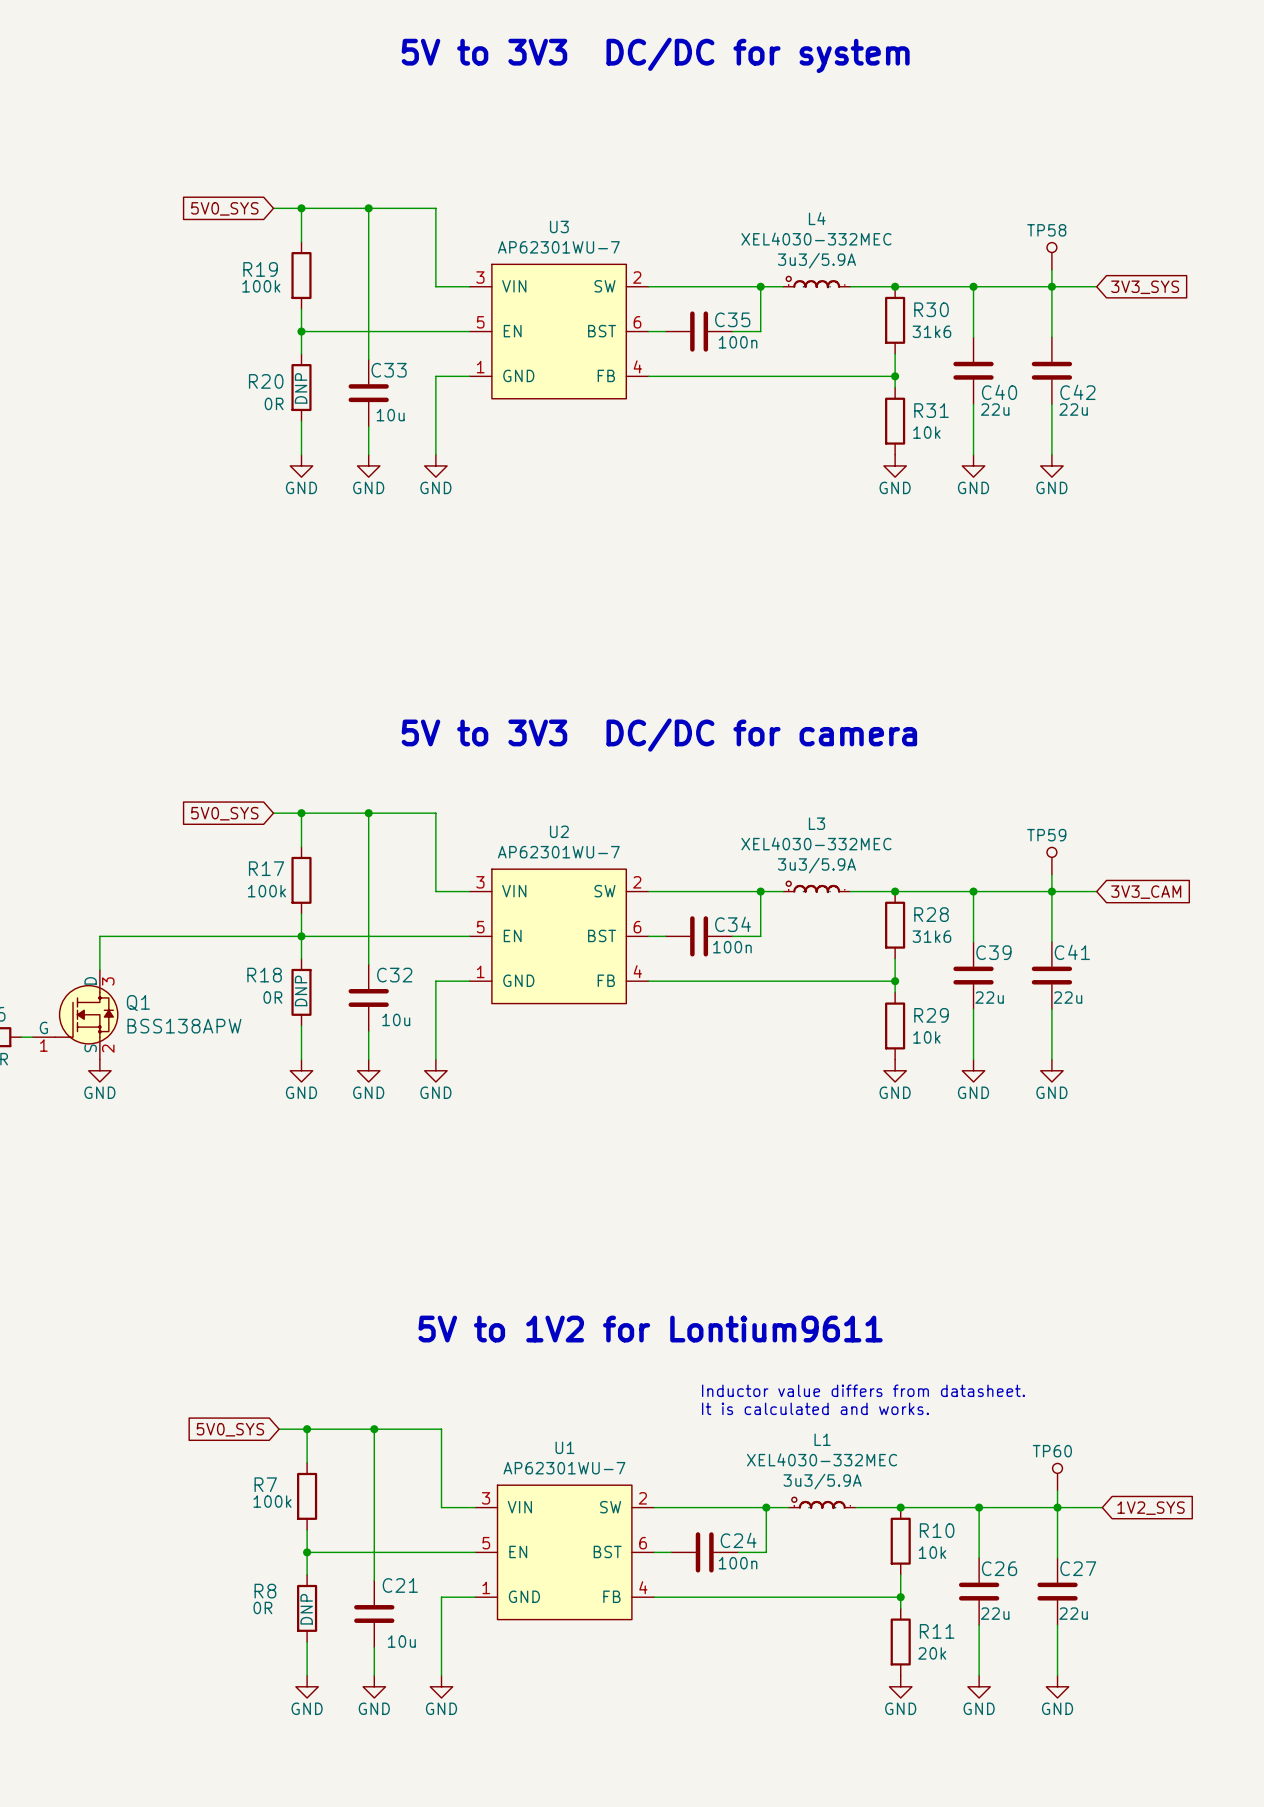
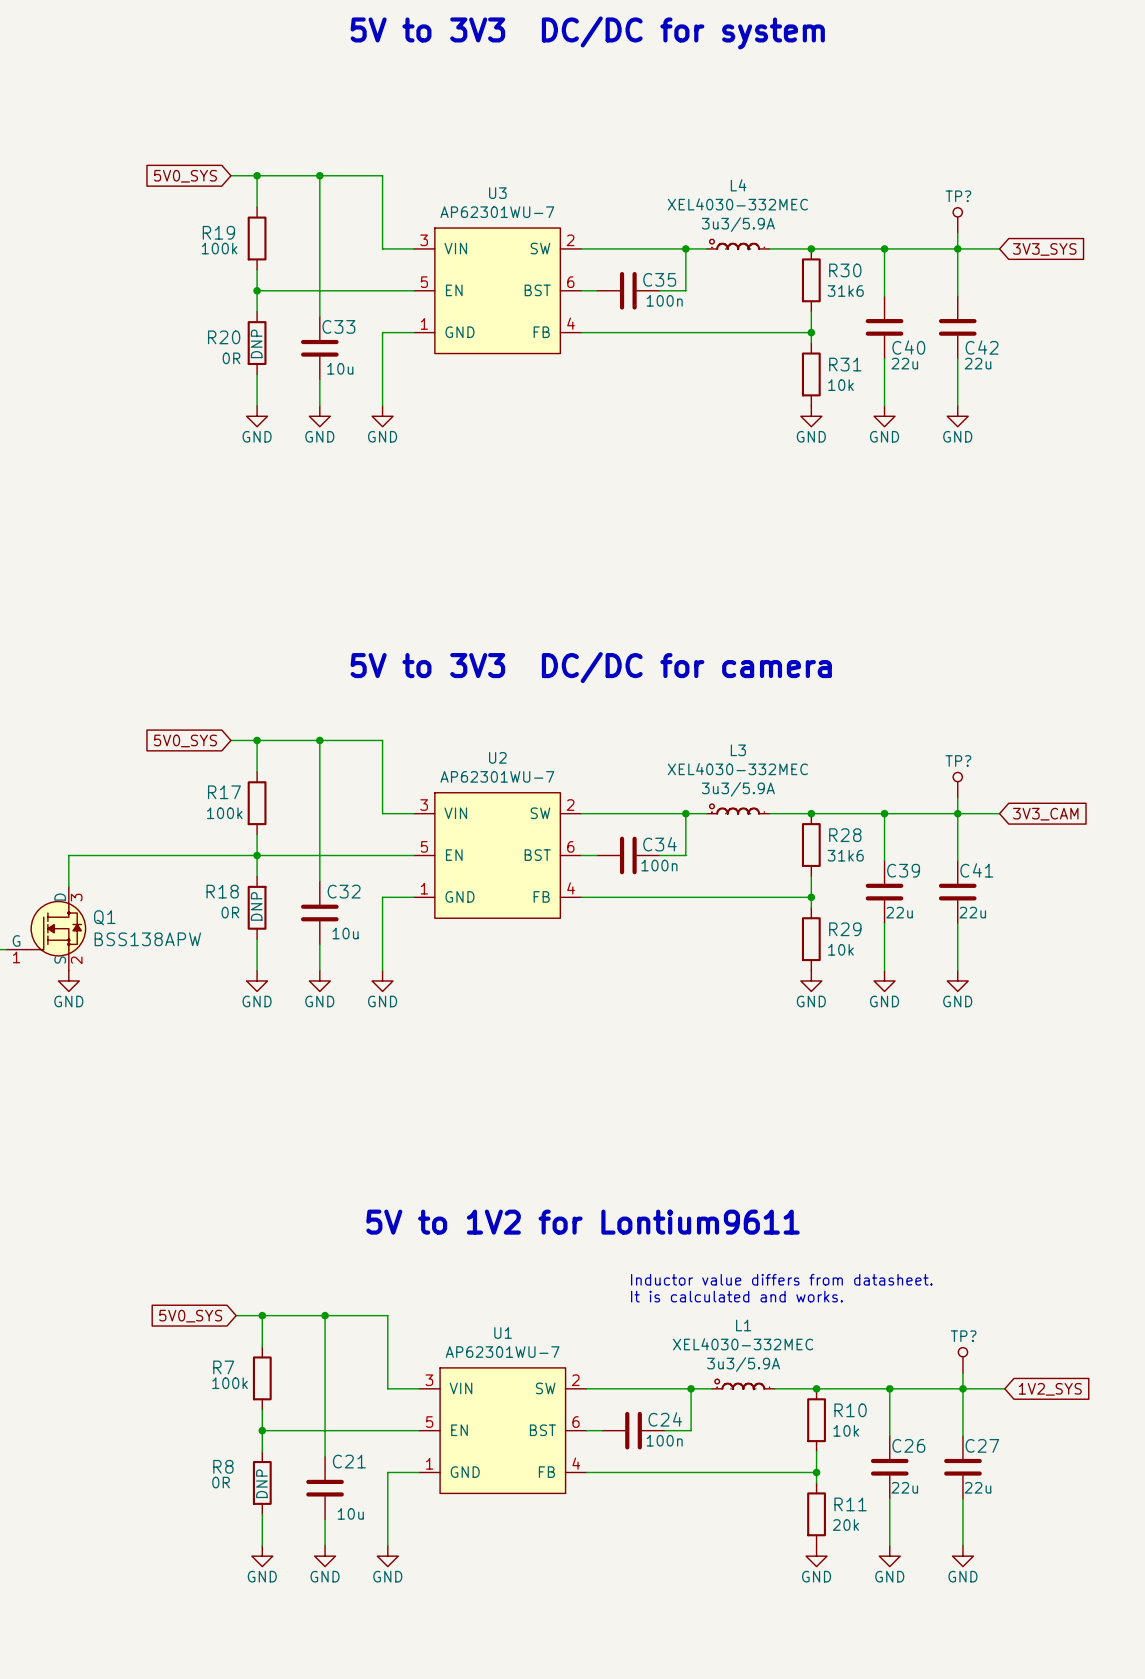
TP58 name: TP58 (1046, 230) -> TP? (958, 196)
TP59 name: TP59 (1046, 835) -> TP? (958, 760)
TP60 name: TP60 (1052, 1451) -> TP? (963, 1336)

